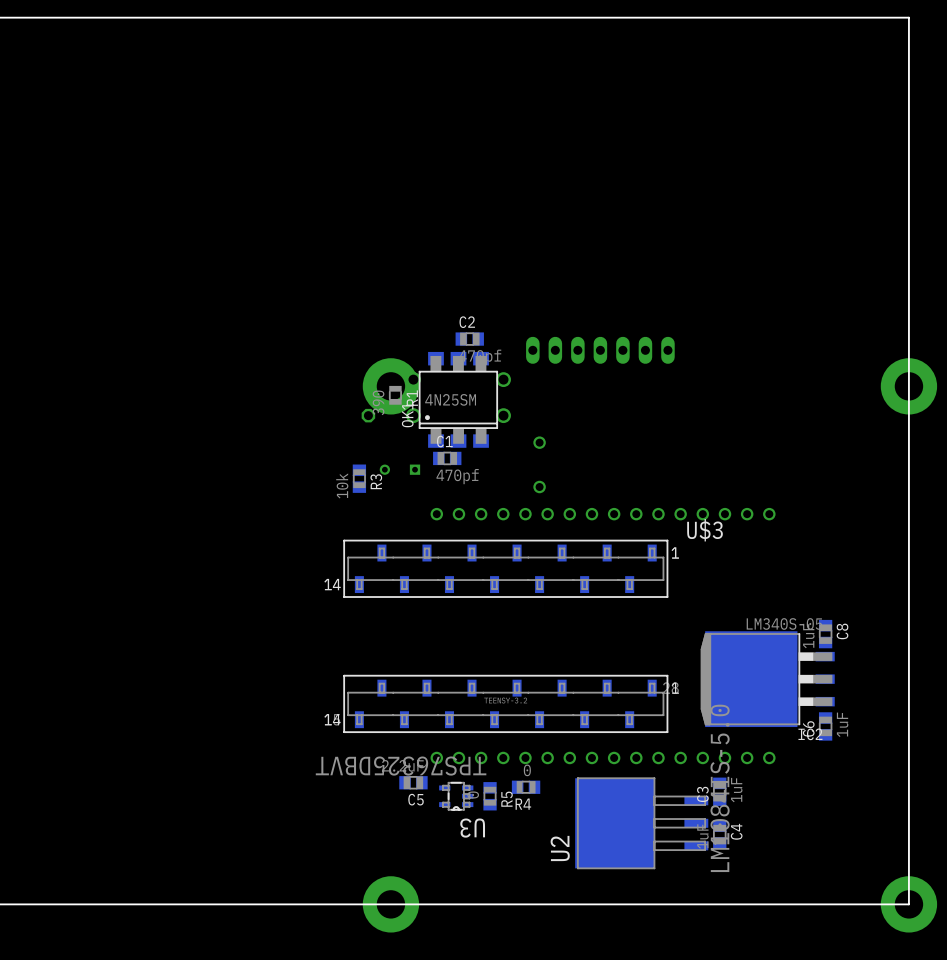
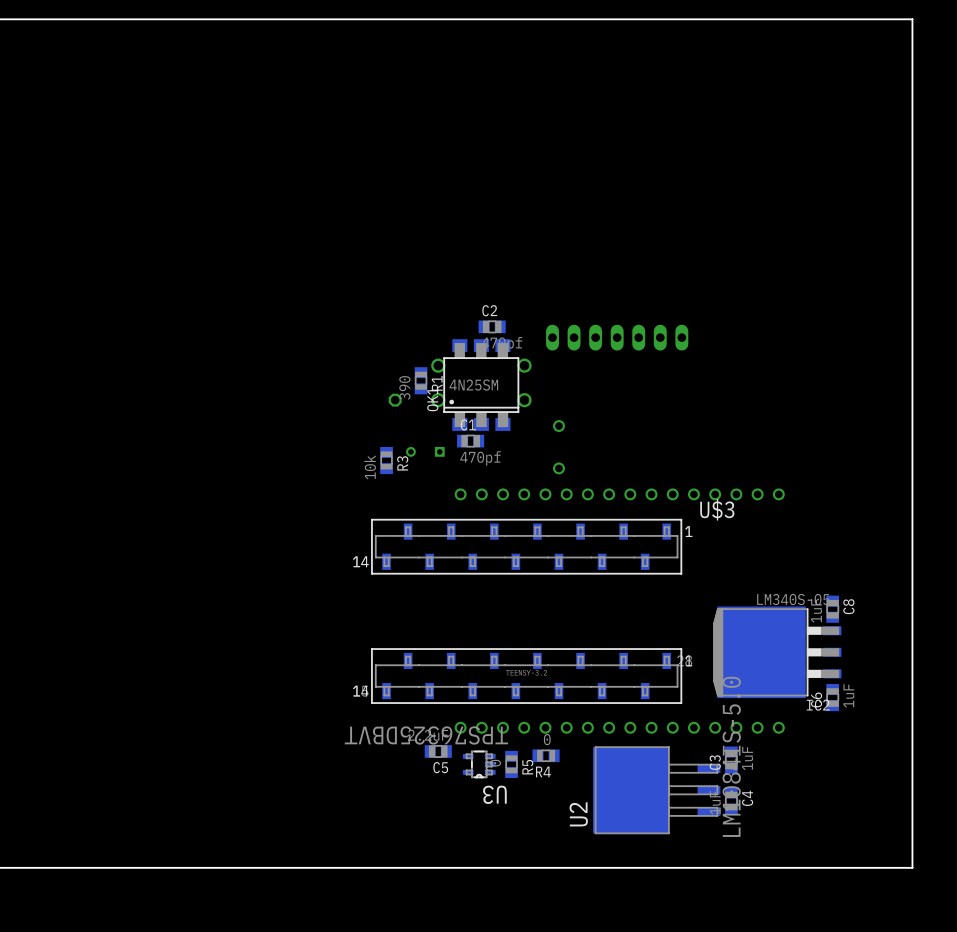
part: (390, 386) -> none
part: (908, 386) -> none
part: (390, 904) -> none
part: (908, 904) -> none

